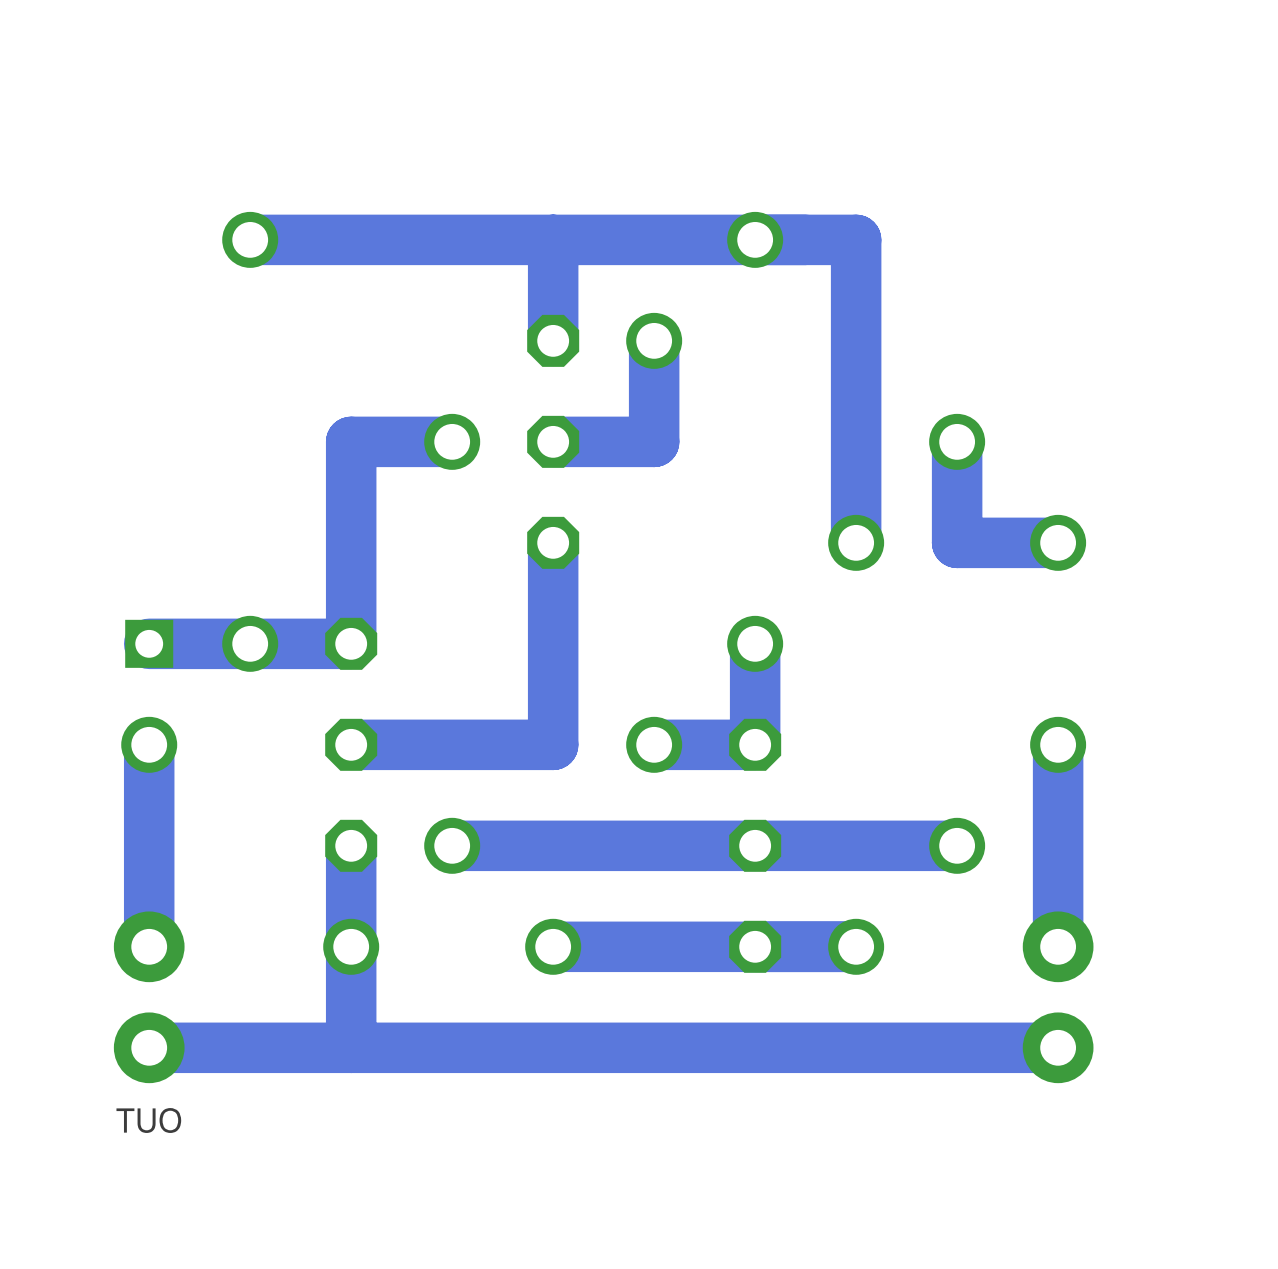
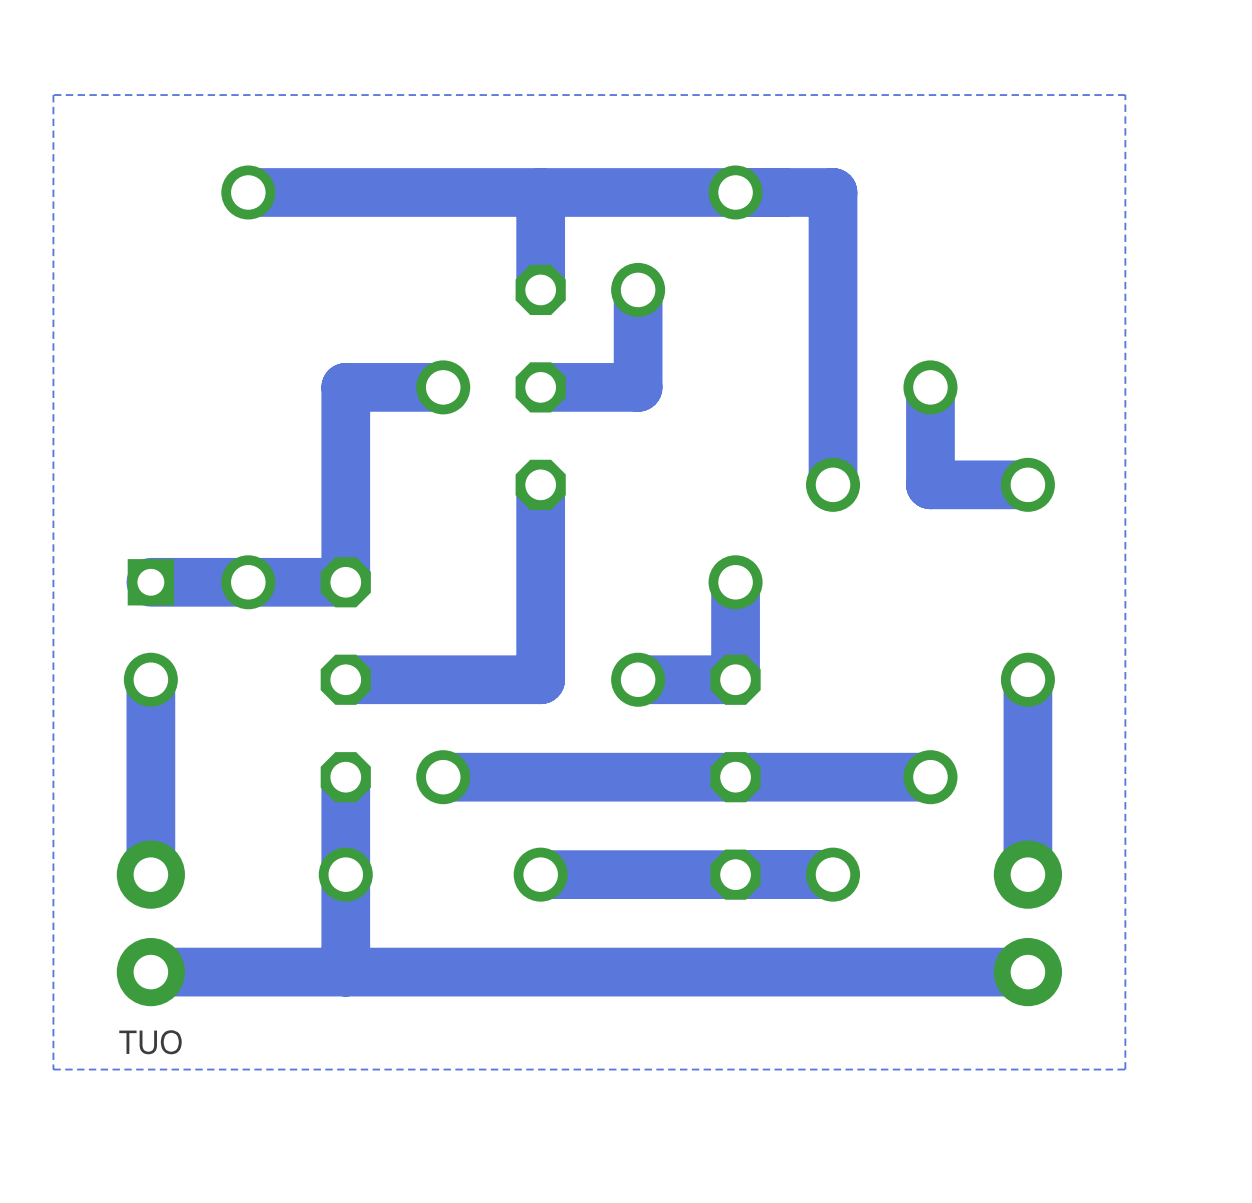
bottom zone outline: none -> (1125, 95) (1125, 1069) (53, 1069) (53, 95) (1125, 95)

